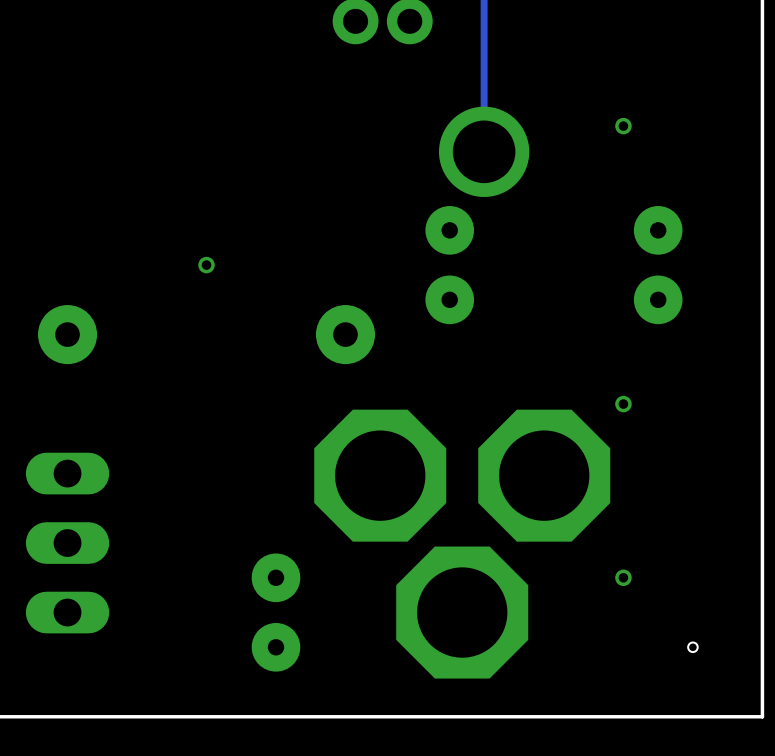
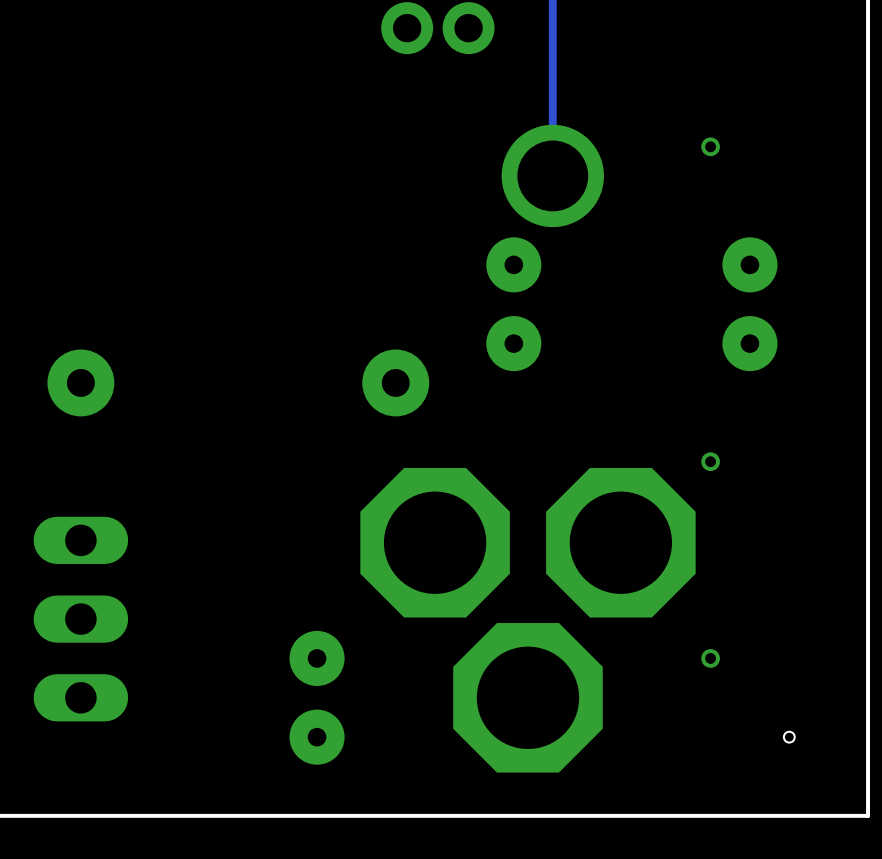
via: (206, 265) -> none

